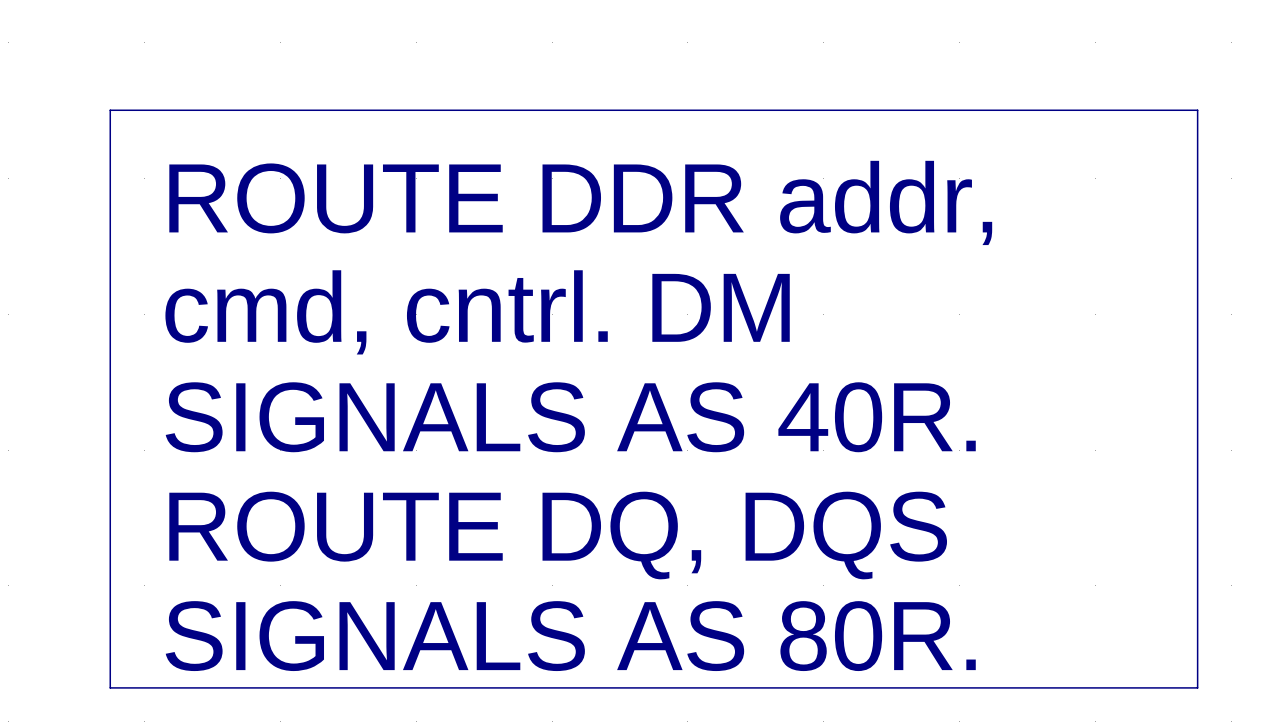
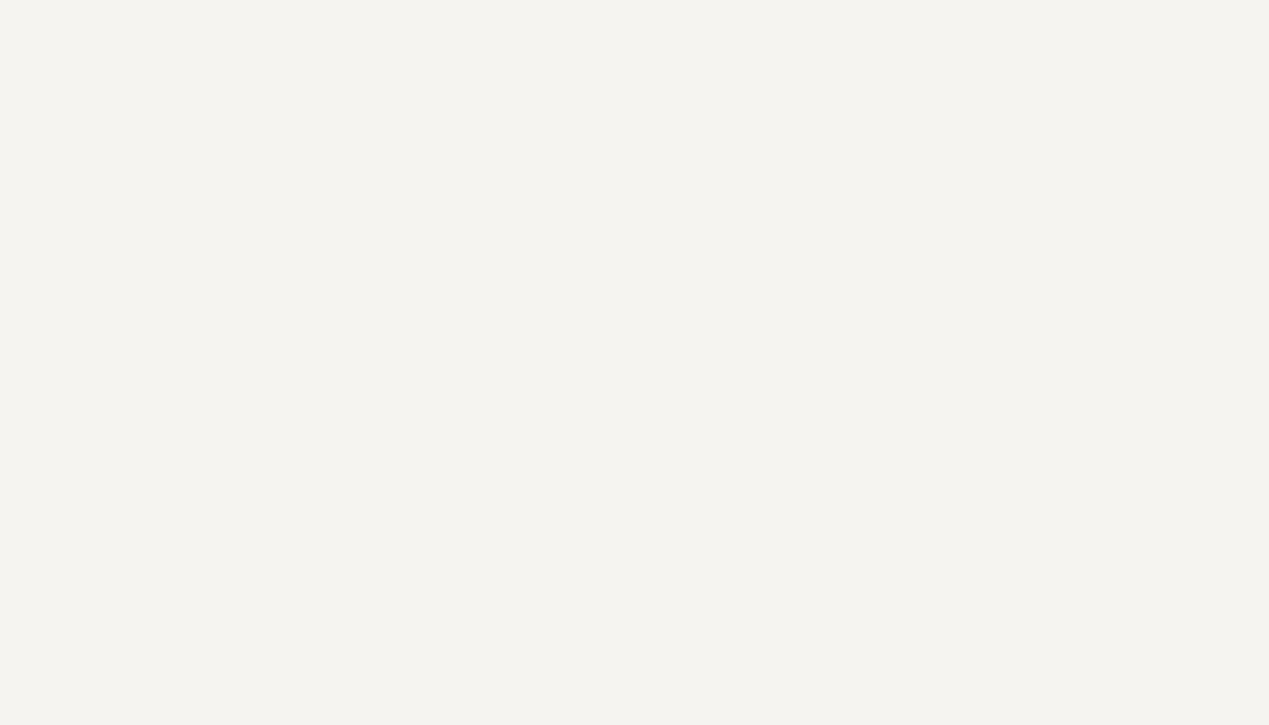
line: (110, 110) (1197, 110) (1197, 687) (110, 687) (110, 110) -> none
text: ROUTE DDR addr, (580, 202) -> none
text: cmd, cntrl. DM (477, 312) -> none
text: SIGNALS AS 40R. (570, 417) -> none
text: ROUTE DQ, DQS (558, 535) -> none
text: SIGNALS AS 80R. (570, 636) -> none

